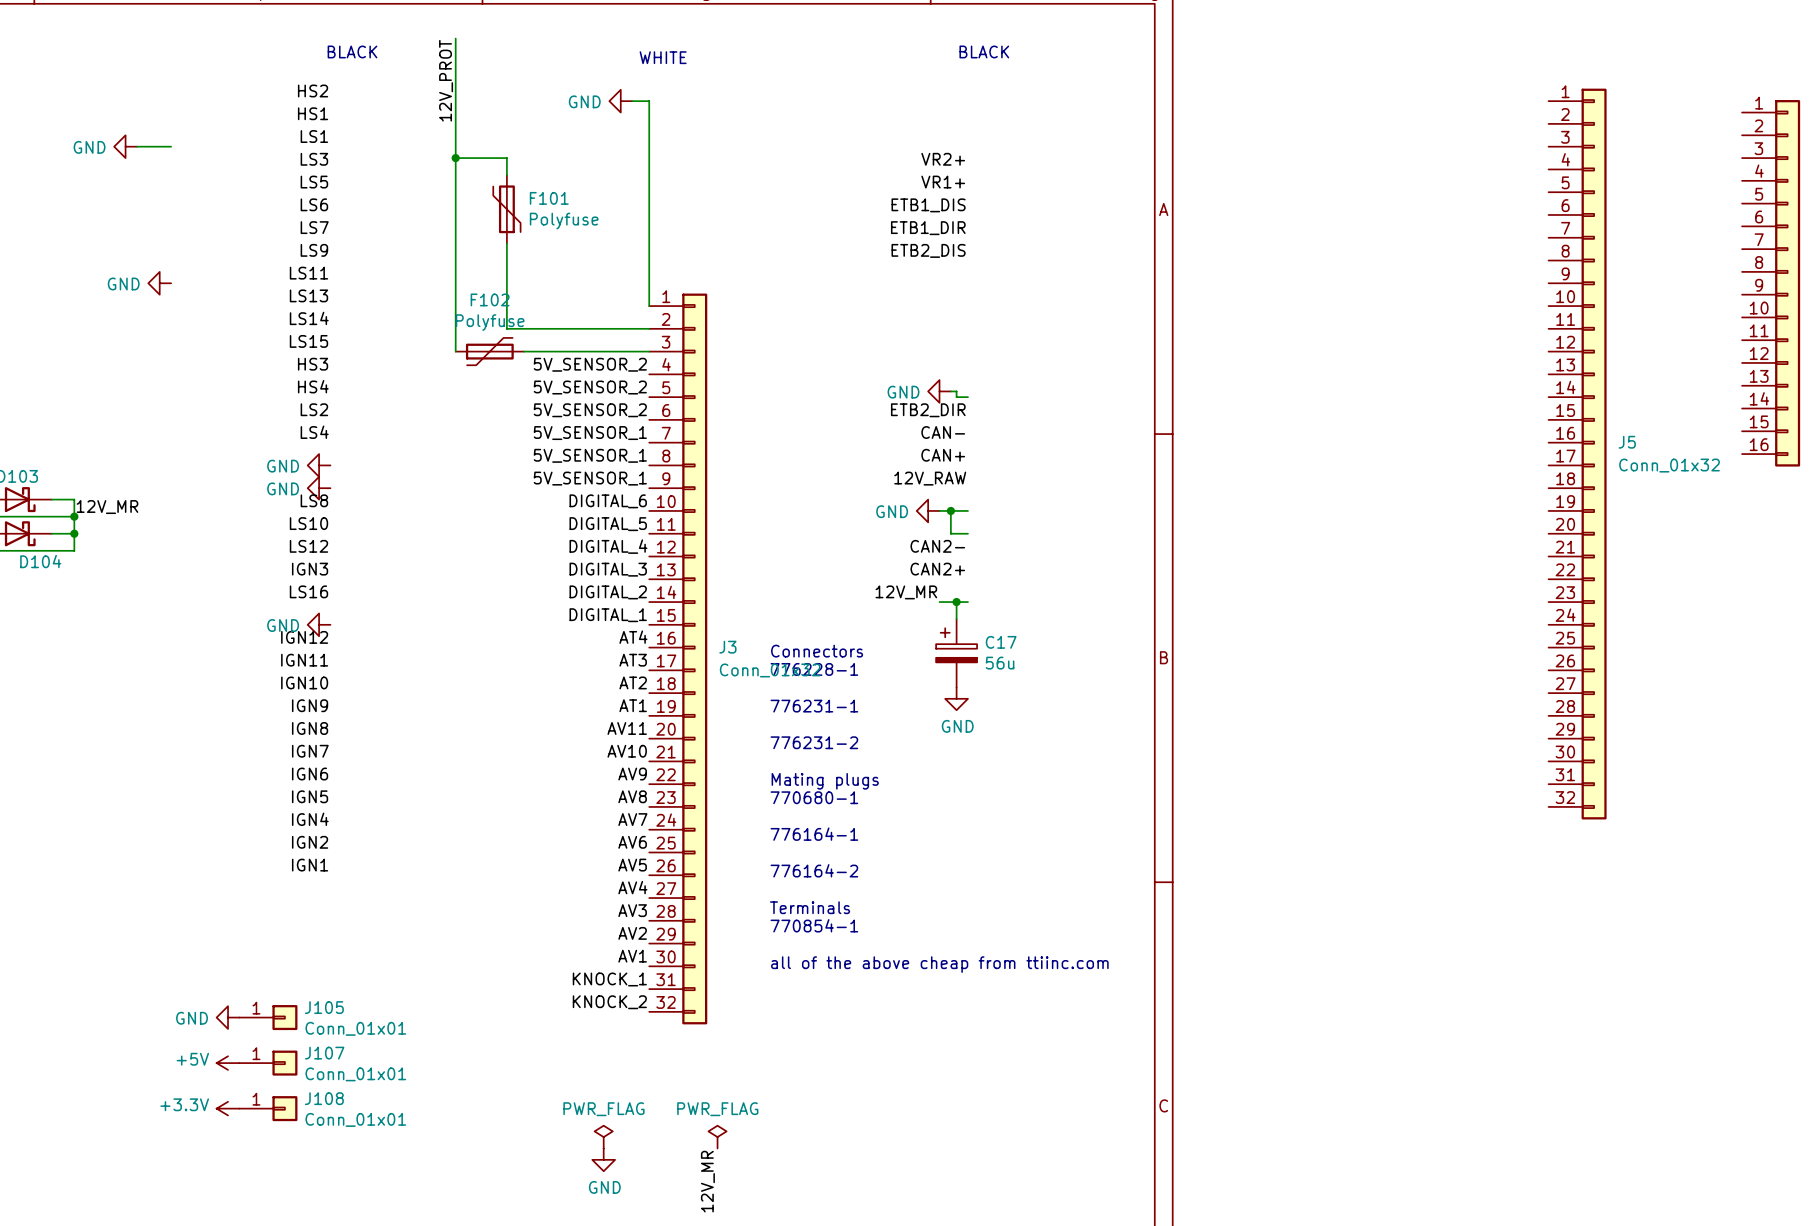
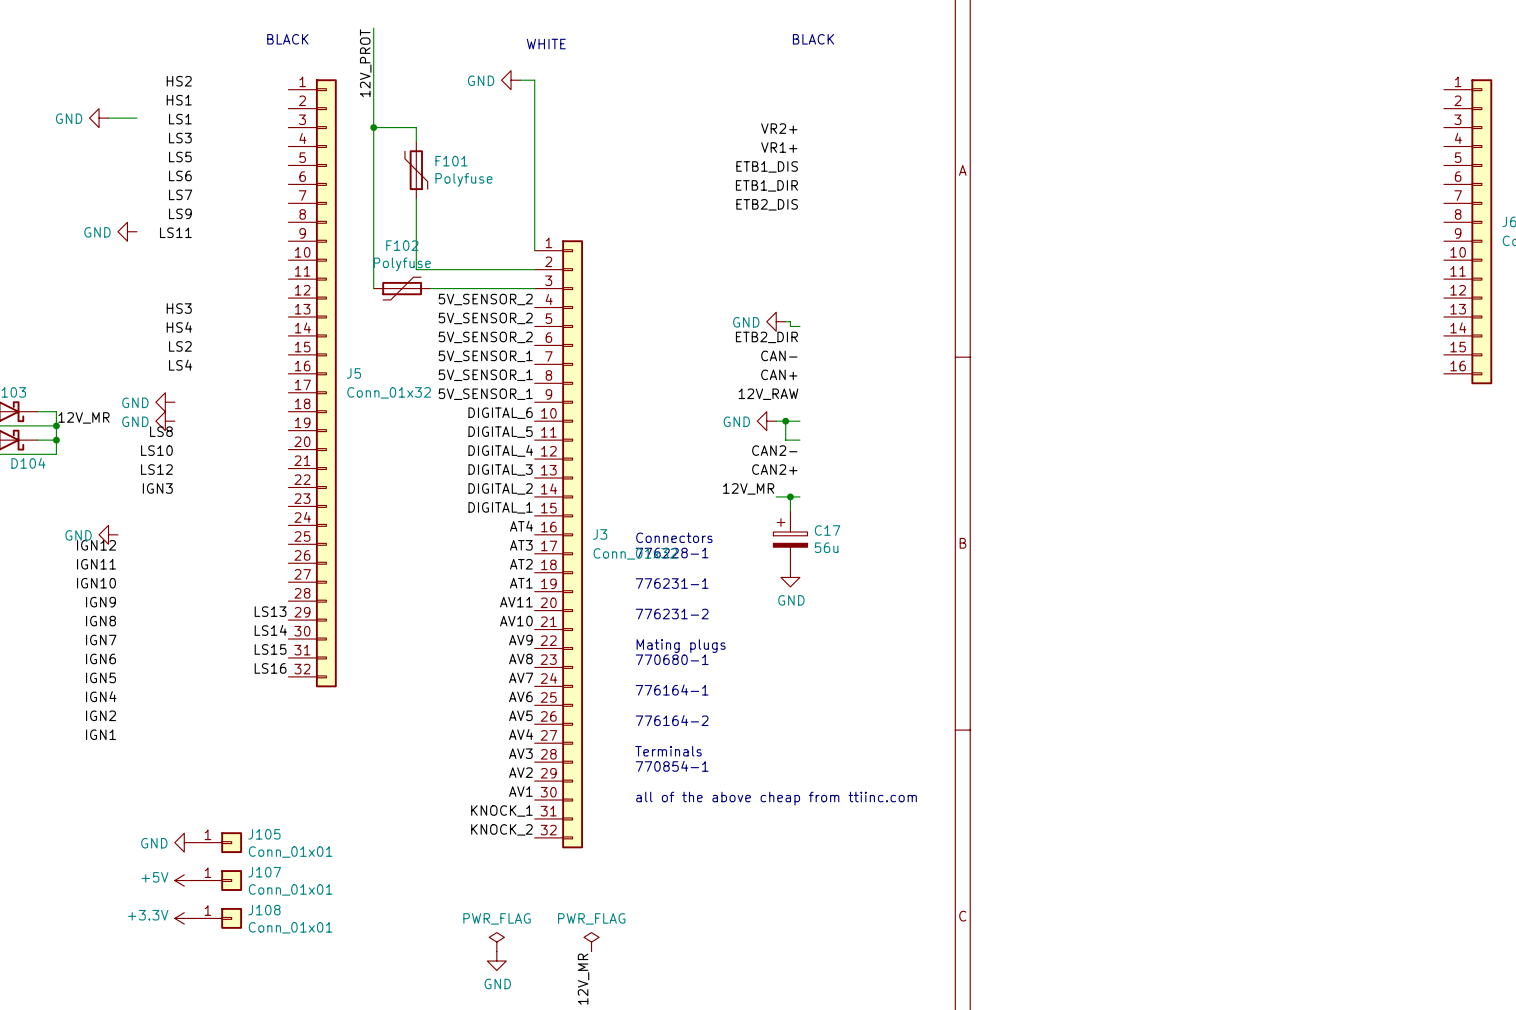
label position: HS2 (313, 90) -> HS2 (179, 81)
label position: HS1 (313, 113) -> HS1 (179, 100)
label position: LS1 (314, 136) -> LS1 (180, 119)
label position: LS3 (314, 159) -> LS3 (180, 138)
label position: LS5 (314, 182) -> LS5 (180, 157)
label position: LS6 (314, 204) -> LS6 (180, 175)
label position: LS7 (314, 227) -> LS7 (180, 194)
label position: LS9 (314, 250) -> LS9 (180, 213)
label position: LS11 (308, 273) -> LS11 (175, 232)
label: LS13 (308, 295) -> none
label: LS14 (309, 318) -> none
label: LS15 (308, 341) -> none
label position: HS3 (313, 364) -> HS3 (179, 308)
label position: HS4 (313, 386) -> HS4 (179, 327)
label position: LS2 (314, 409) -> LS2 (180, 346)
label position: LS4 (314, 432) -> LS4 (180, 365)
J5 position: (1577, 454) -> (312, 383)
power symbol: GND (319, 465) -> none
power symbol: none -> GND (165, 402)
power symbol: GND (319, 488) -> none
label position: LS8 (314, 500) -> LS8 (161, 431)
power symbol: none -> GND (165, 421)
label position: LS10 (308, 523) -> LS10 (156, 450)
label position: LS12 (308, 546) -> LS12 (156, 469)
label position: IGN3 (310, 569) -> IGN3 (157, 488)
label position: LS16 (308, 591) -> LS16 (270, 668)
power symbol: GND (319, 624) -> none
label position: IGN12 (304, 637) -> IGN12 (96, 545)
power symbol: none -> GND (108, 534)
label position: IGN11 (304, 660) -> IGN11 (96, 564)
label position: IGN10 (304, 682) -> IGN10 (96, 583)
label position: IGN9 (310, 705) -> IGN9 (100, 602)
label position: IGN8 (310, 728) -> IGN8 (100, 621)
label: none -> LS13 (270, 611)
label position: IGN7 (310, 751) -> IGN7 (101, 640)
label: none -> LS14 (270, 630)
label position: IGN6 (310, 774) -> IGN6 (100, 658)
label: none -> LS15 (270, 649)
label position: IGN5 (310, 796) -> IGN5 (100, 677)
label position: IGN4 (310, 819) -> IGN4 (101, 696)
label position: IGN2 (310, 842) -> IGN2 (100, 715)
label position: IGN1 (310, 865) -> IGN1 (100, 734)

